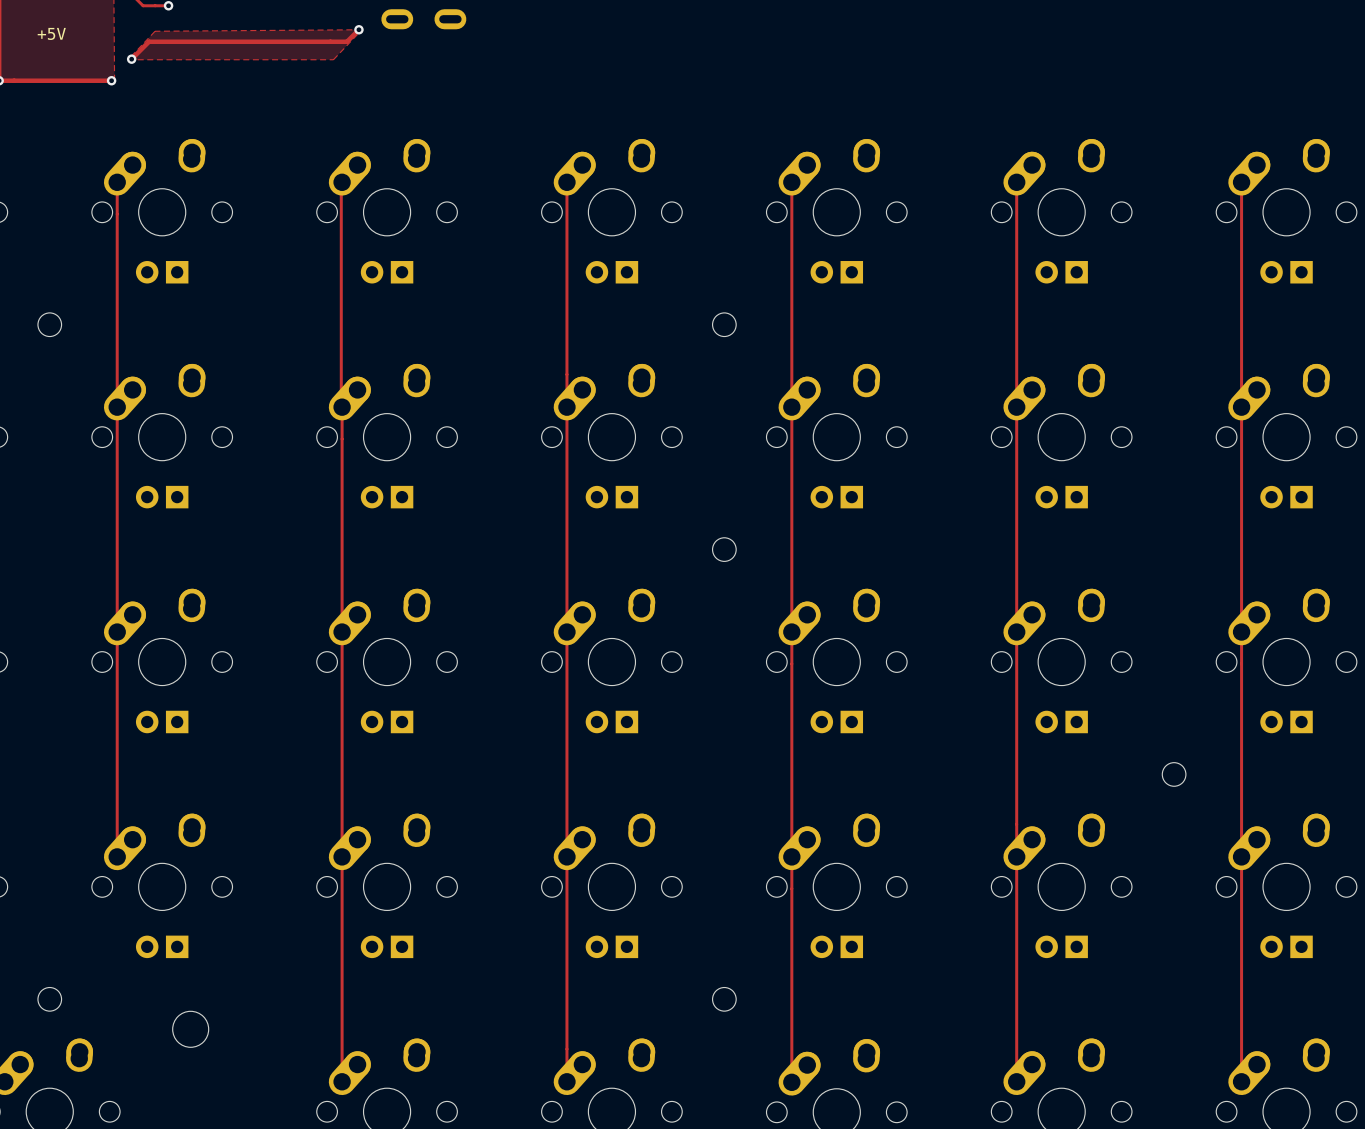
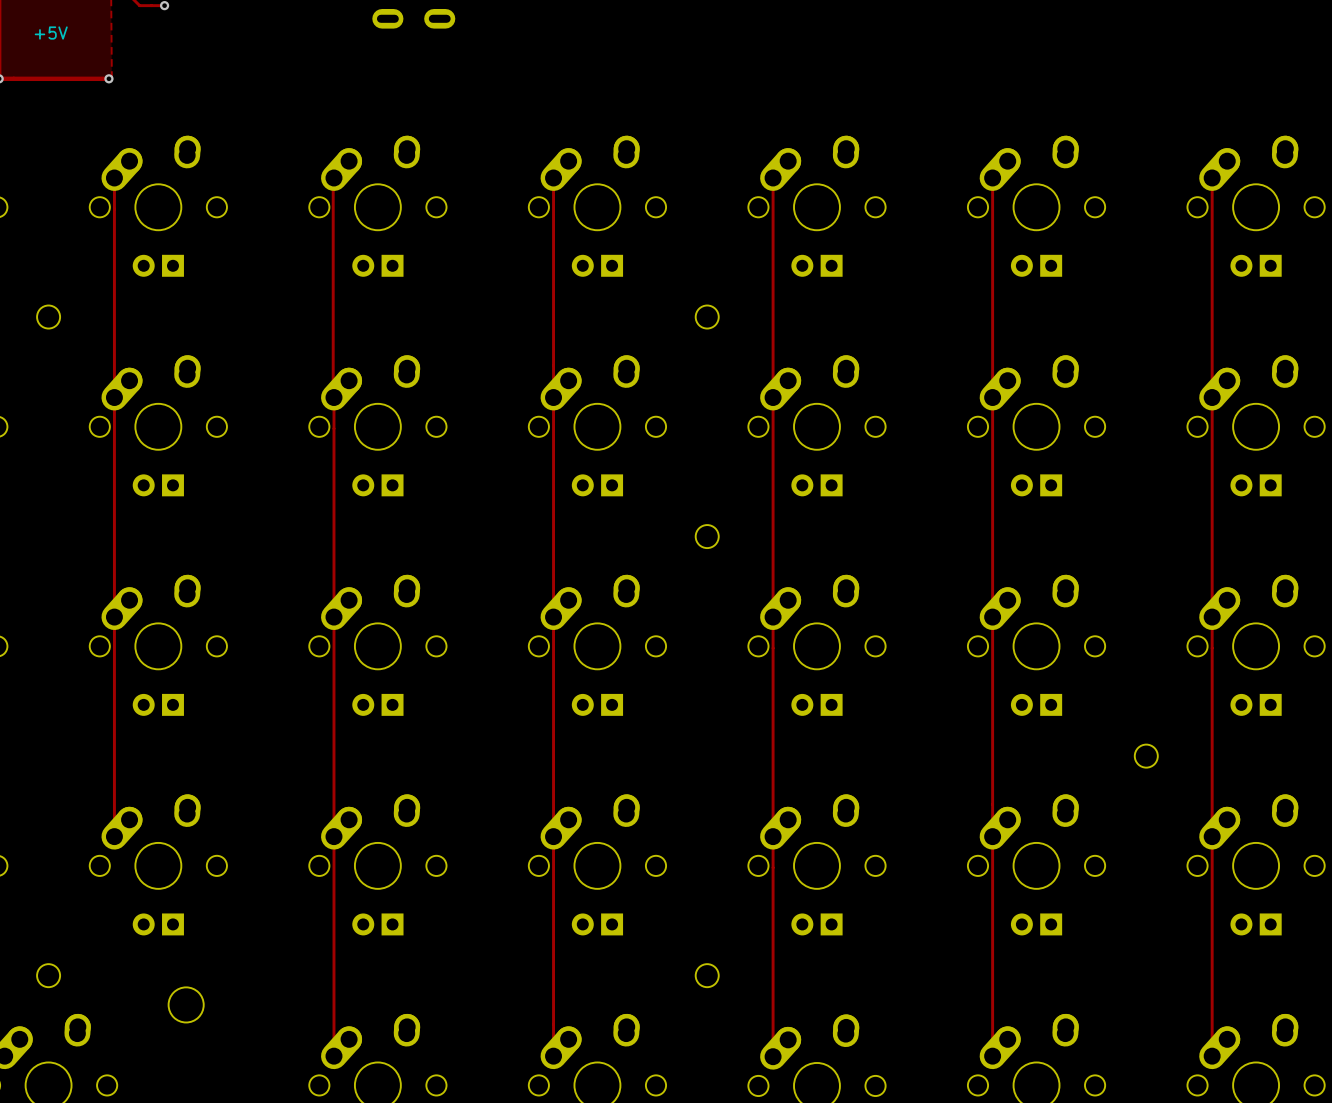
track: (358, 29) (346, 41) (149, 41) (131, 59) -> none
via: (358, 29) -> none
zone outline: (361, 29) (155, 31) (128, 59) (333, 59) (361, 29) -> none
via: (131, 59) -> none

